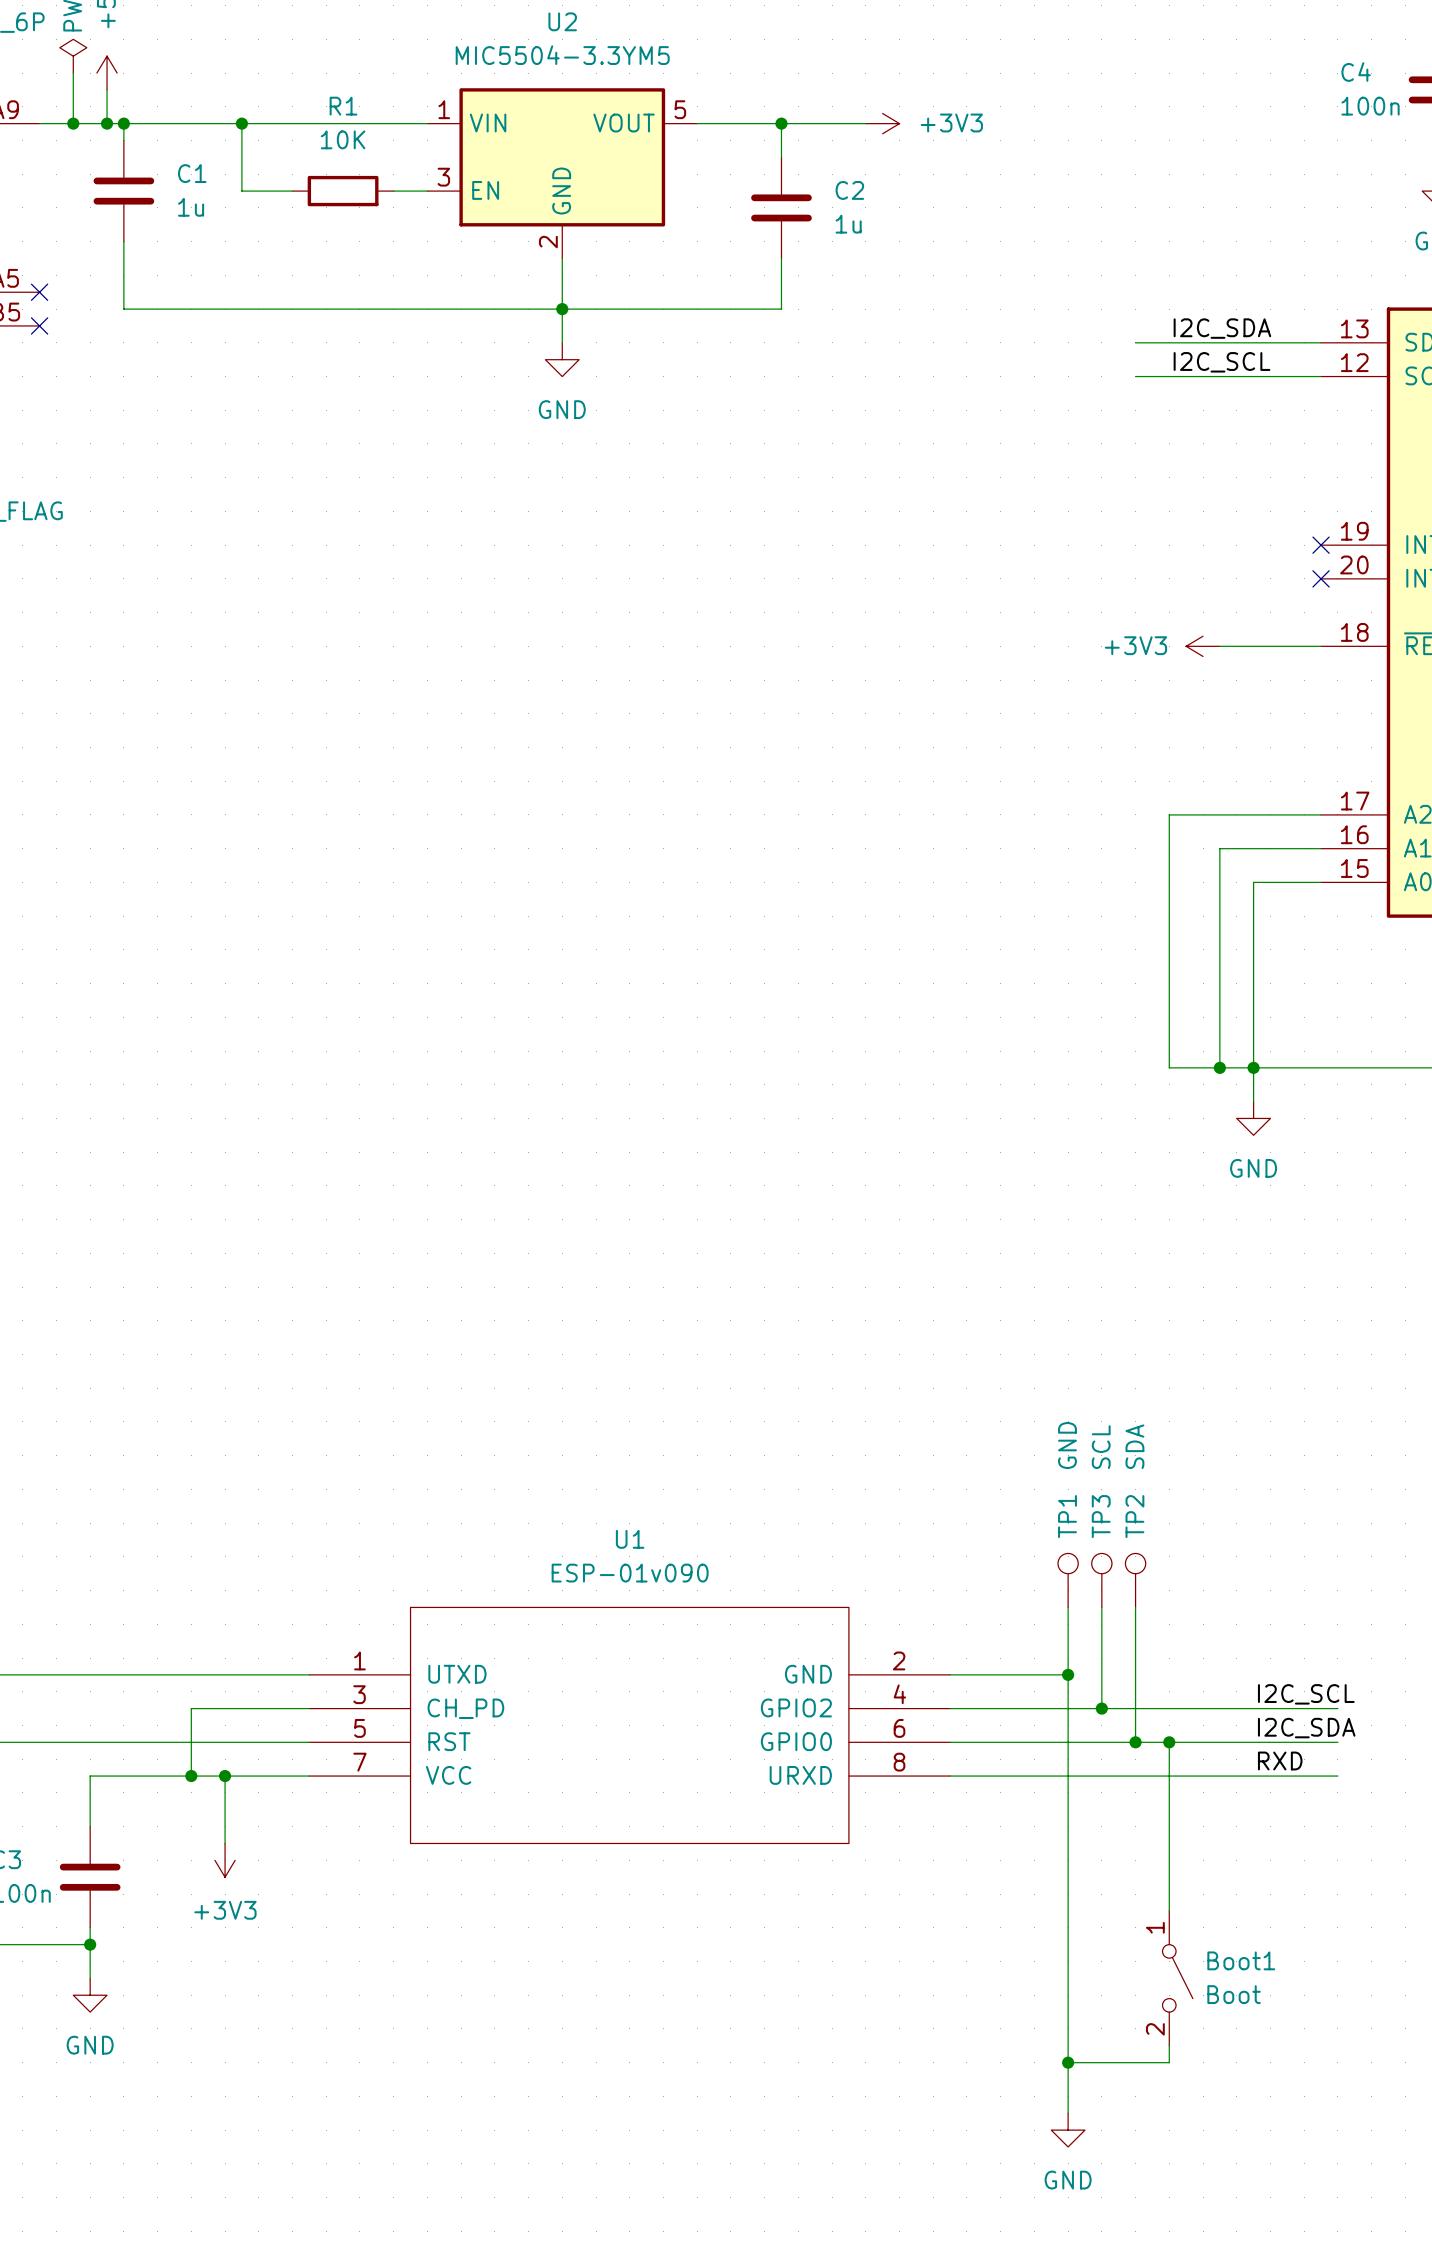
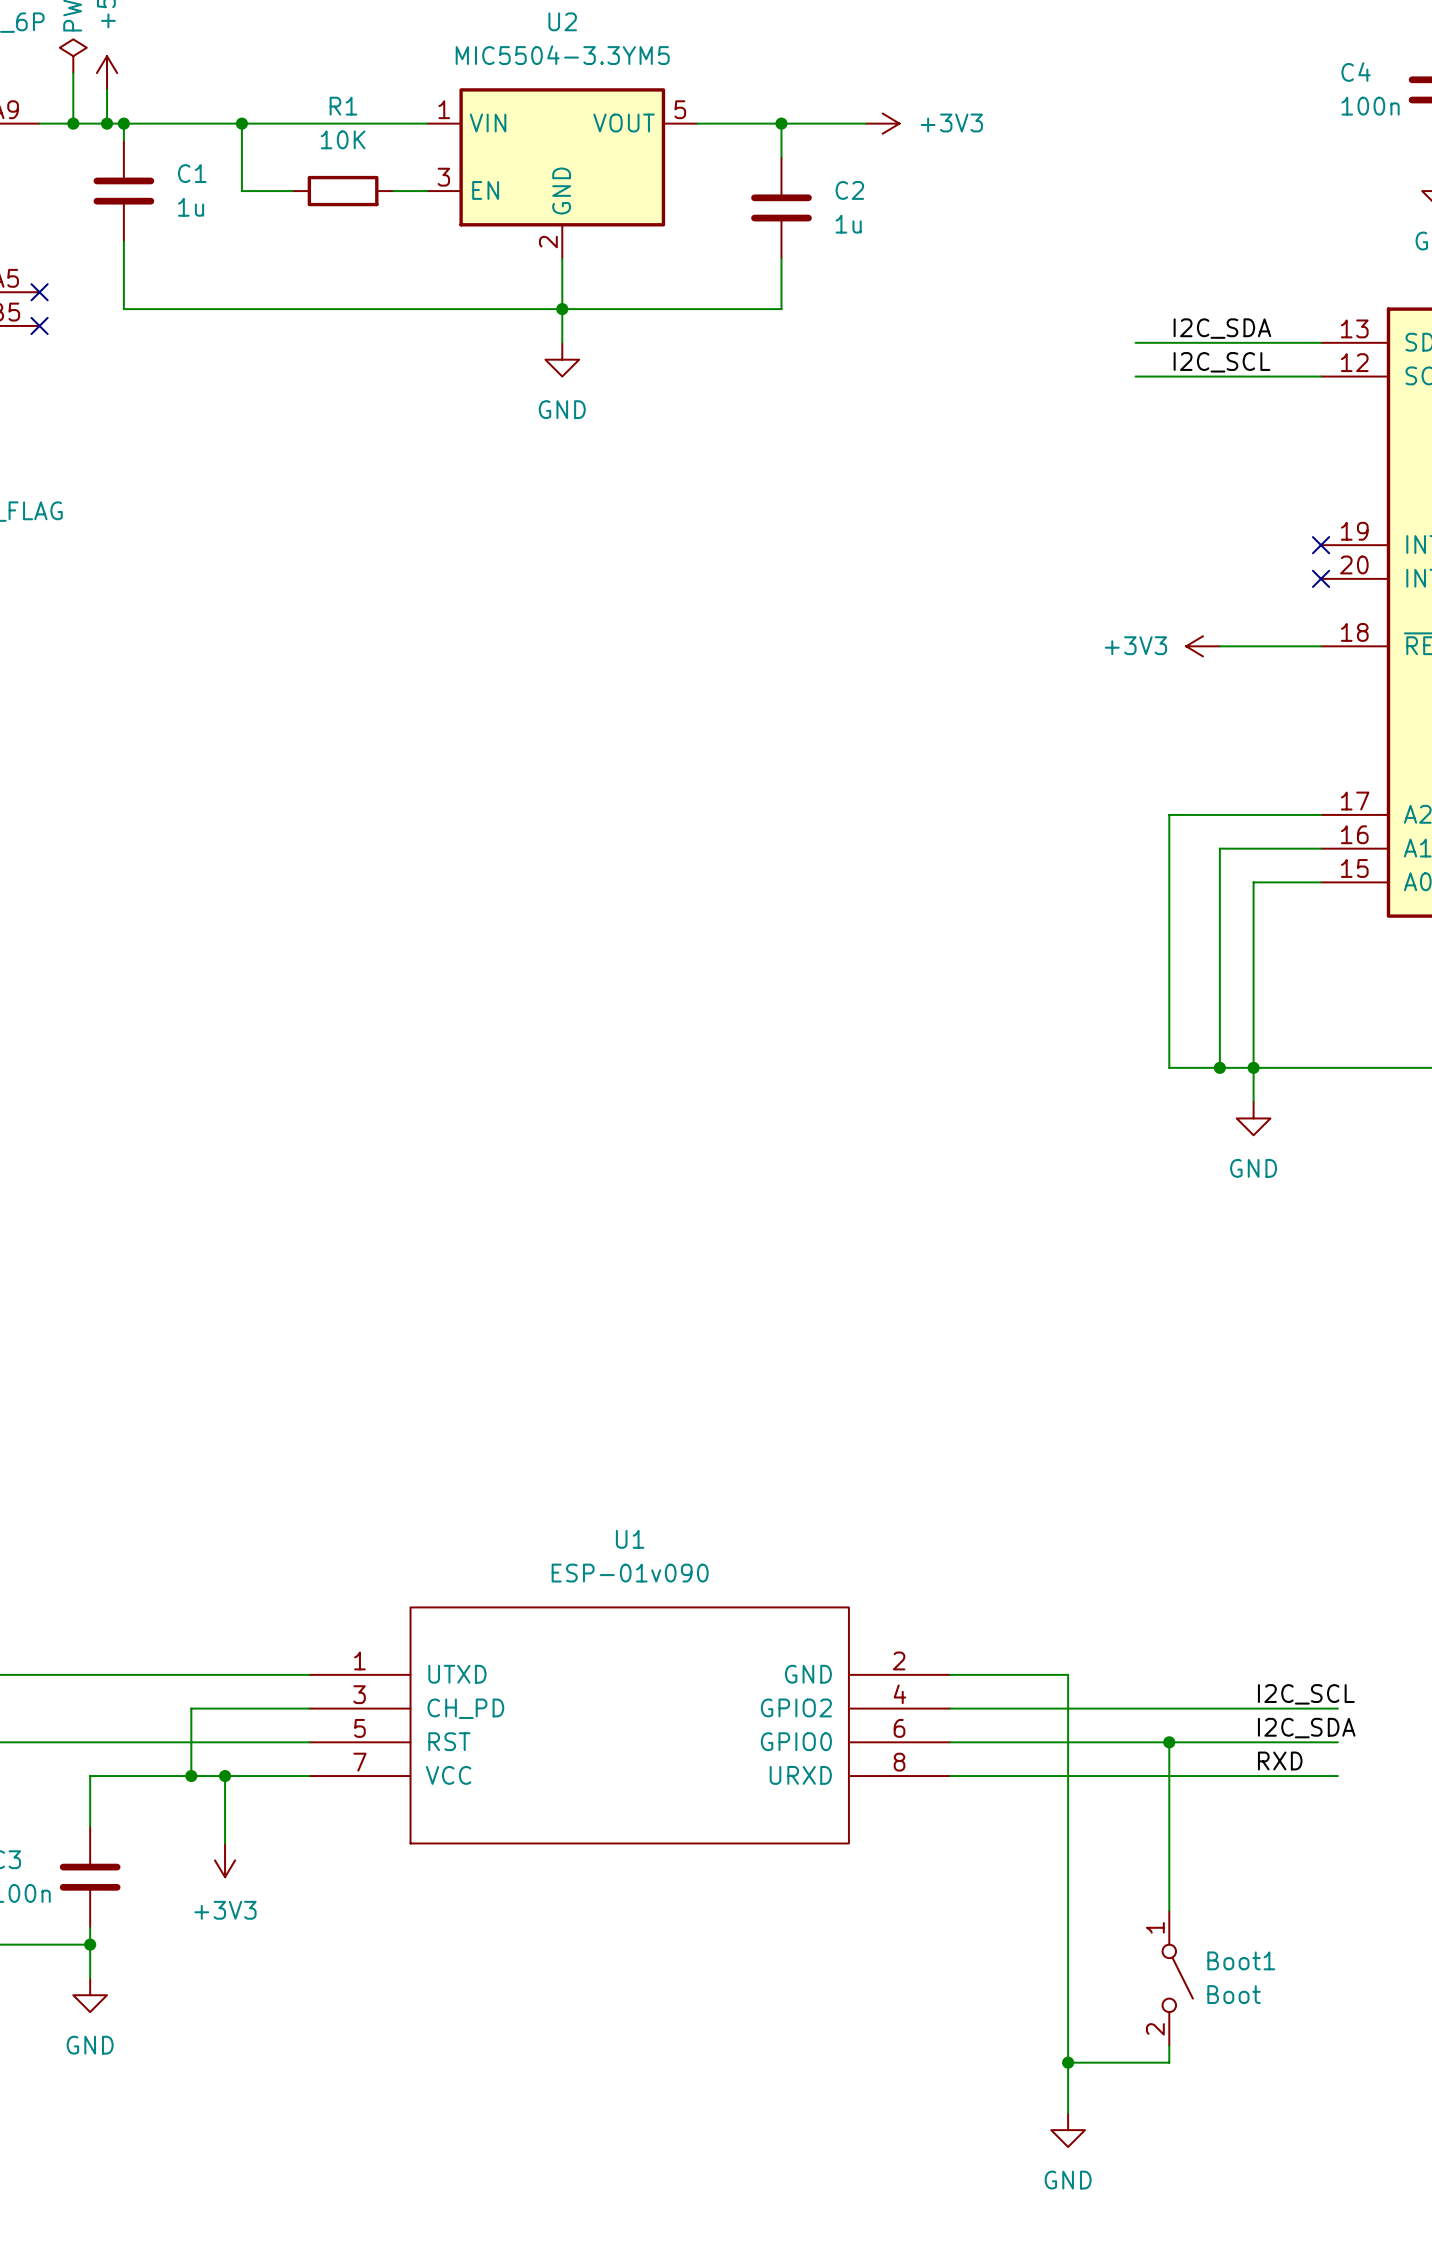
TP1: GND (1068, 1580) -> none
TP3: SCL (1101, 1580) -> none
TP2: SDA (1135, 1580) -> none
wire: (1068, 1607) (1068, 1674) -> none
wire: (1101, 1607) (1101, 1708) -> none
wire: (1135, 1607) (1135, 1742) -> none
junction: (1068, 1674) -> none
junction: (1101, 1708) -> none
junction: (1135, 1742) -> none

